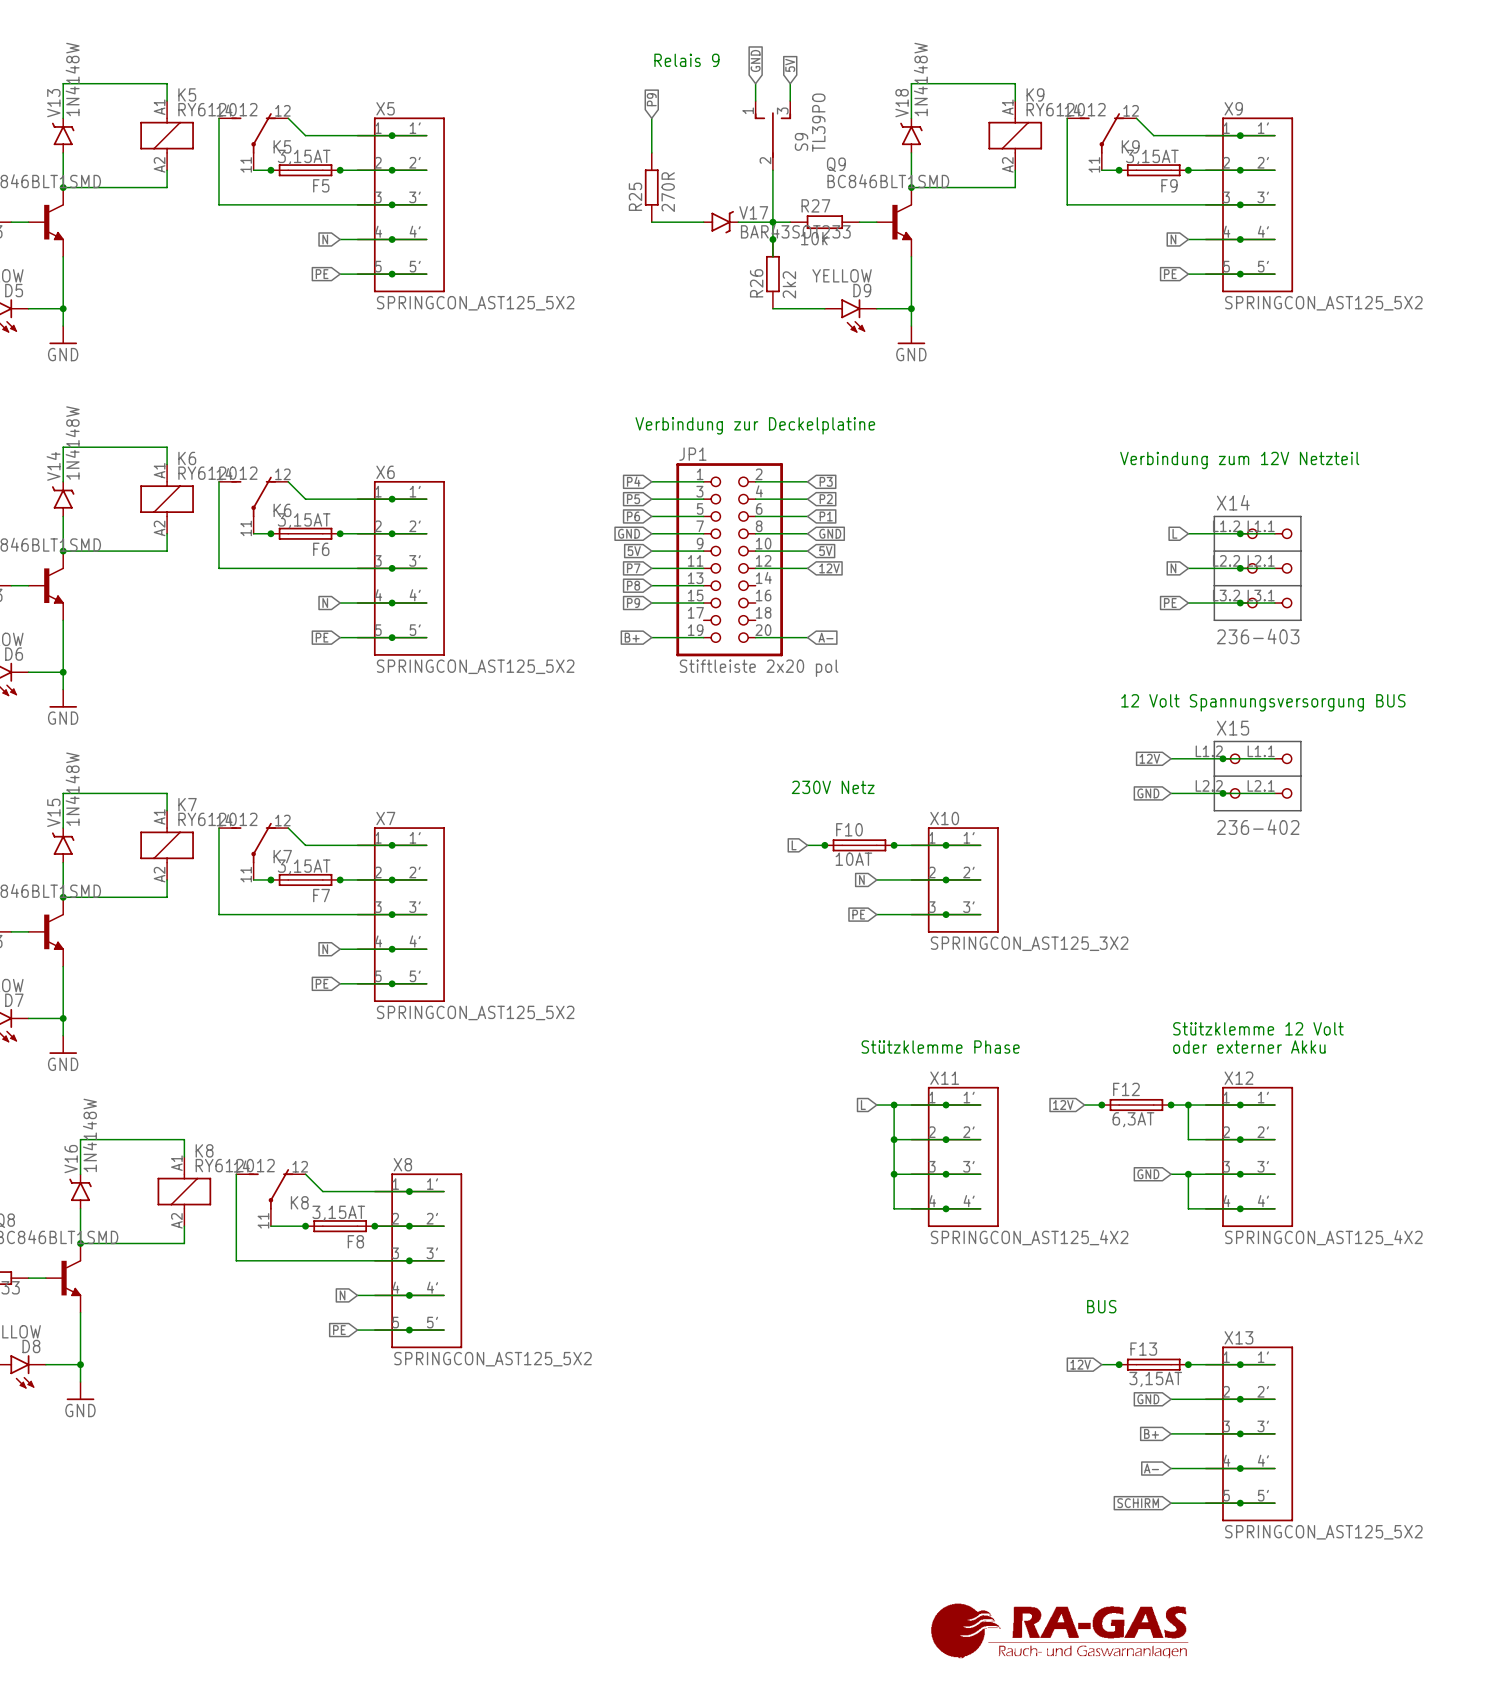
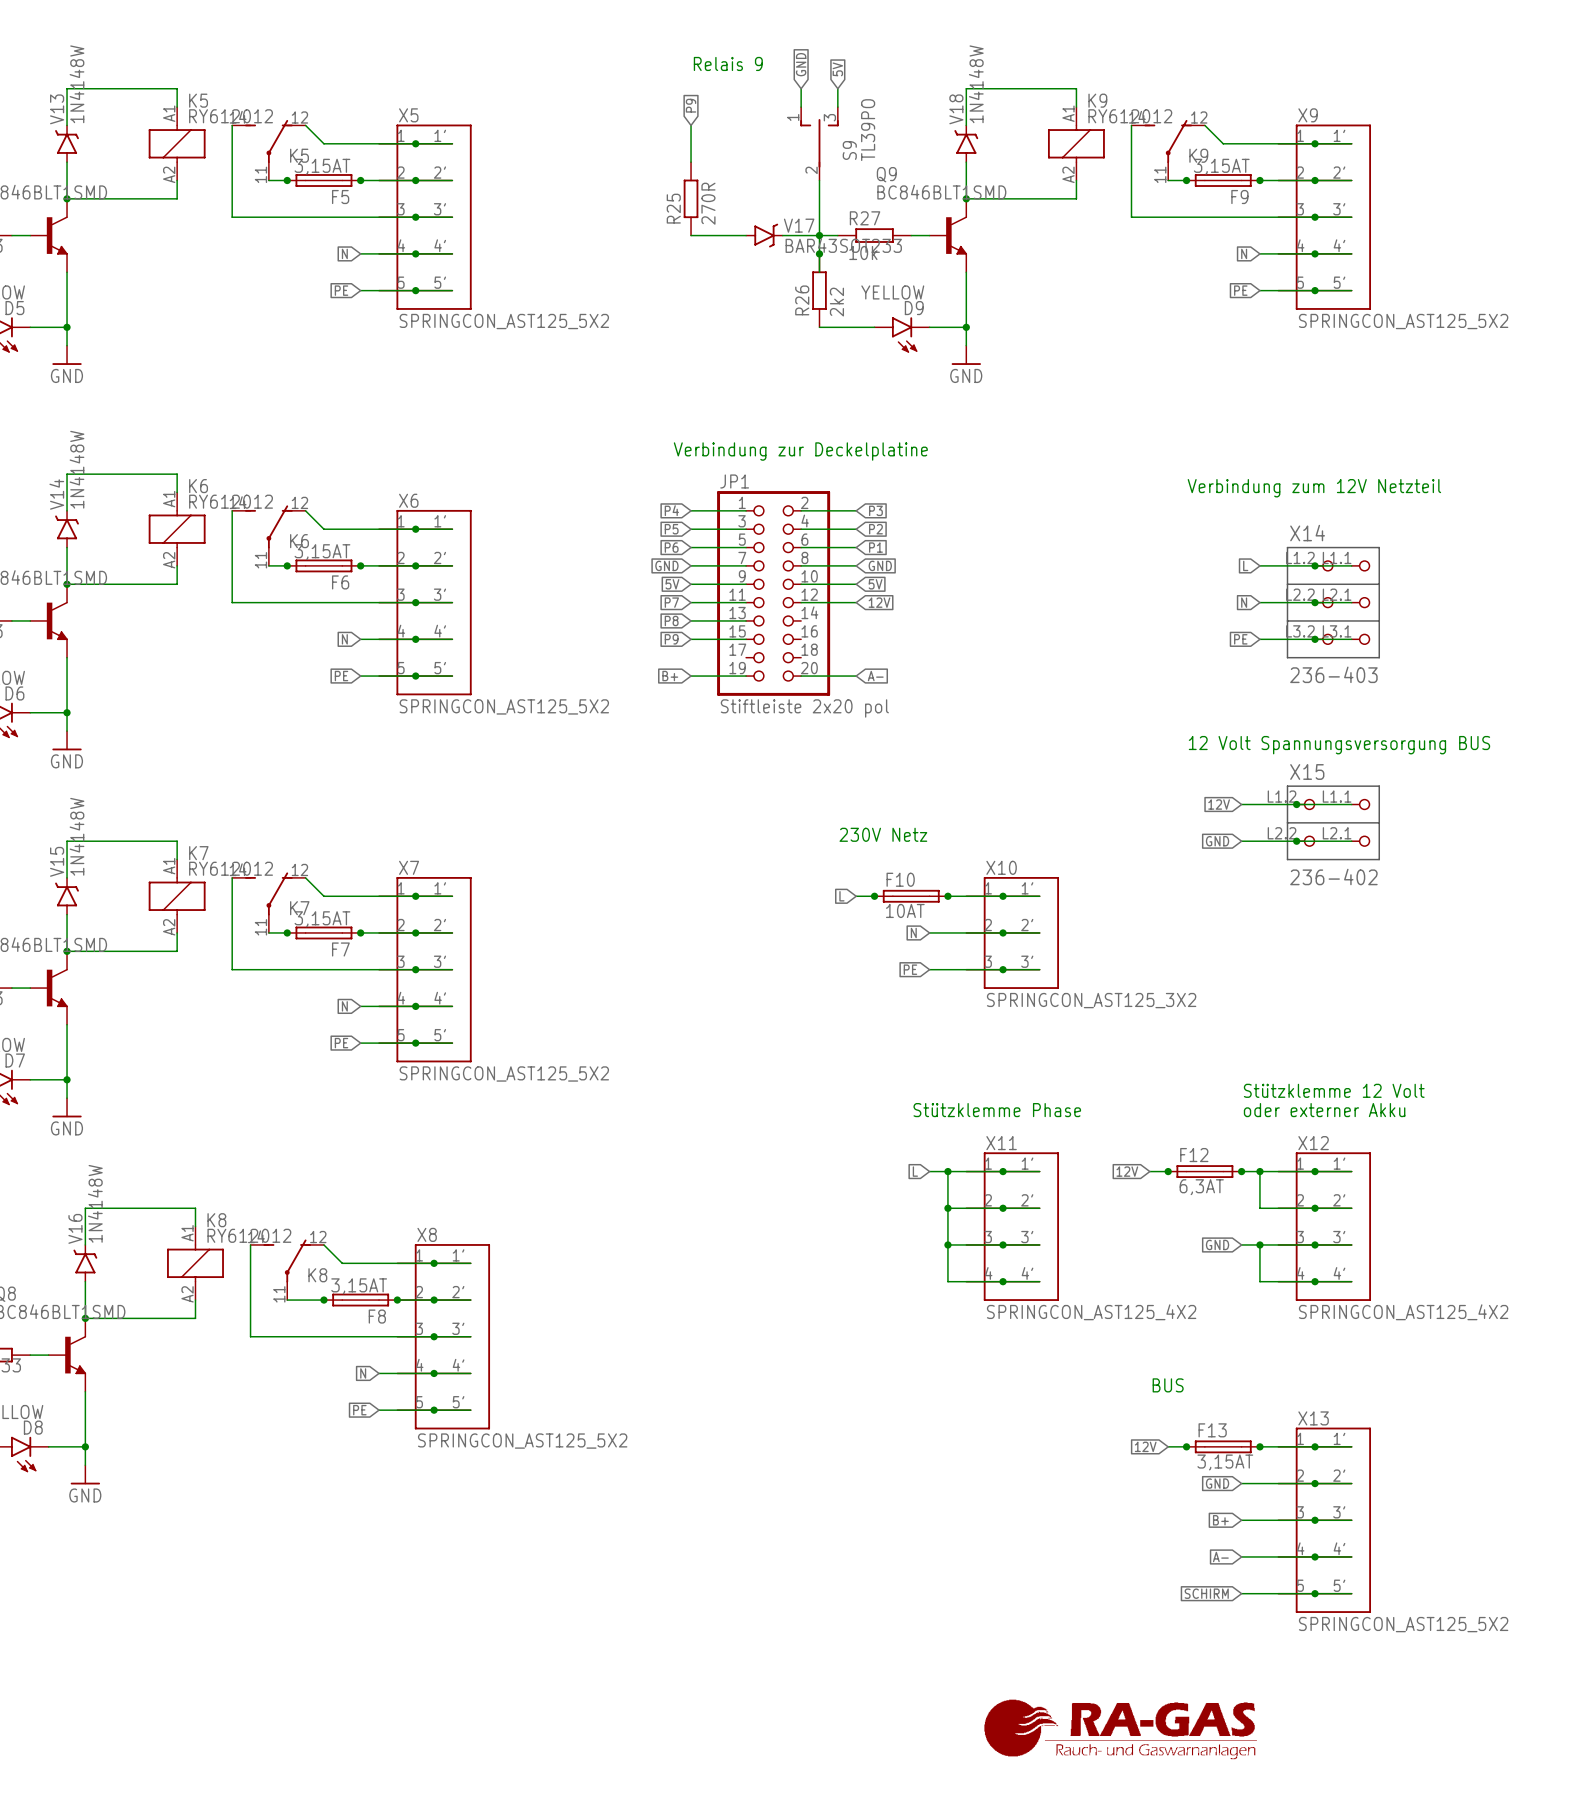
drawing: [931, 1603, 1189, 1659] -> none
part: none -> (1120, 1729)

